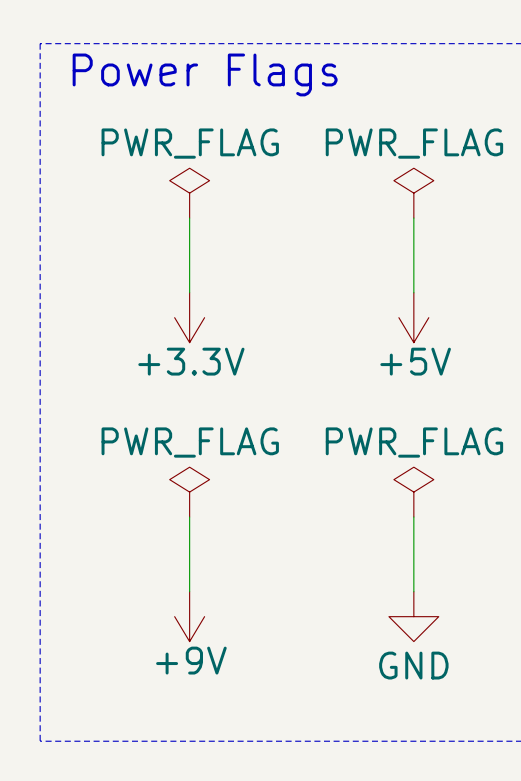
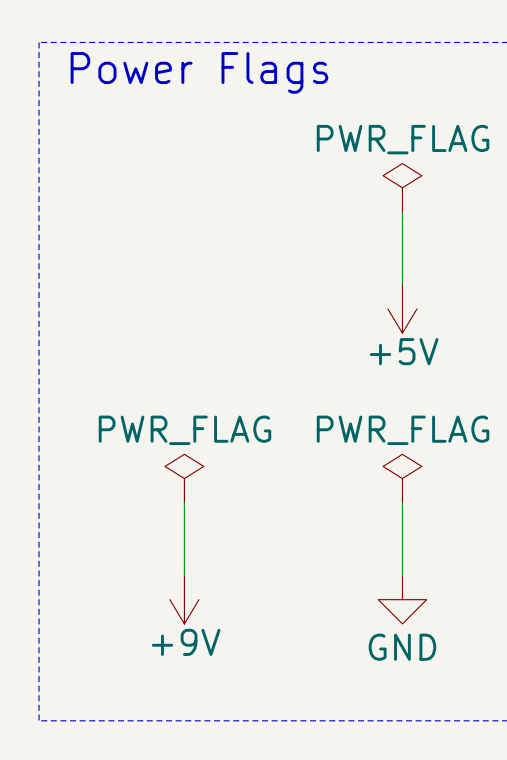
power symbol: PWR_FLAG (189, 193) -> none
wire: (189, 218) (189, 292) -> none
power symbol: +3.3V (189, 317) -> none

